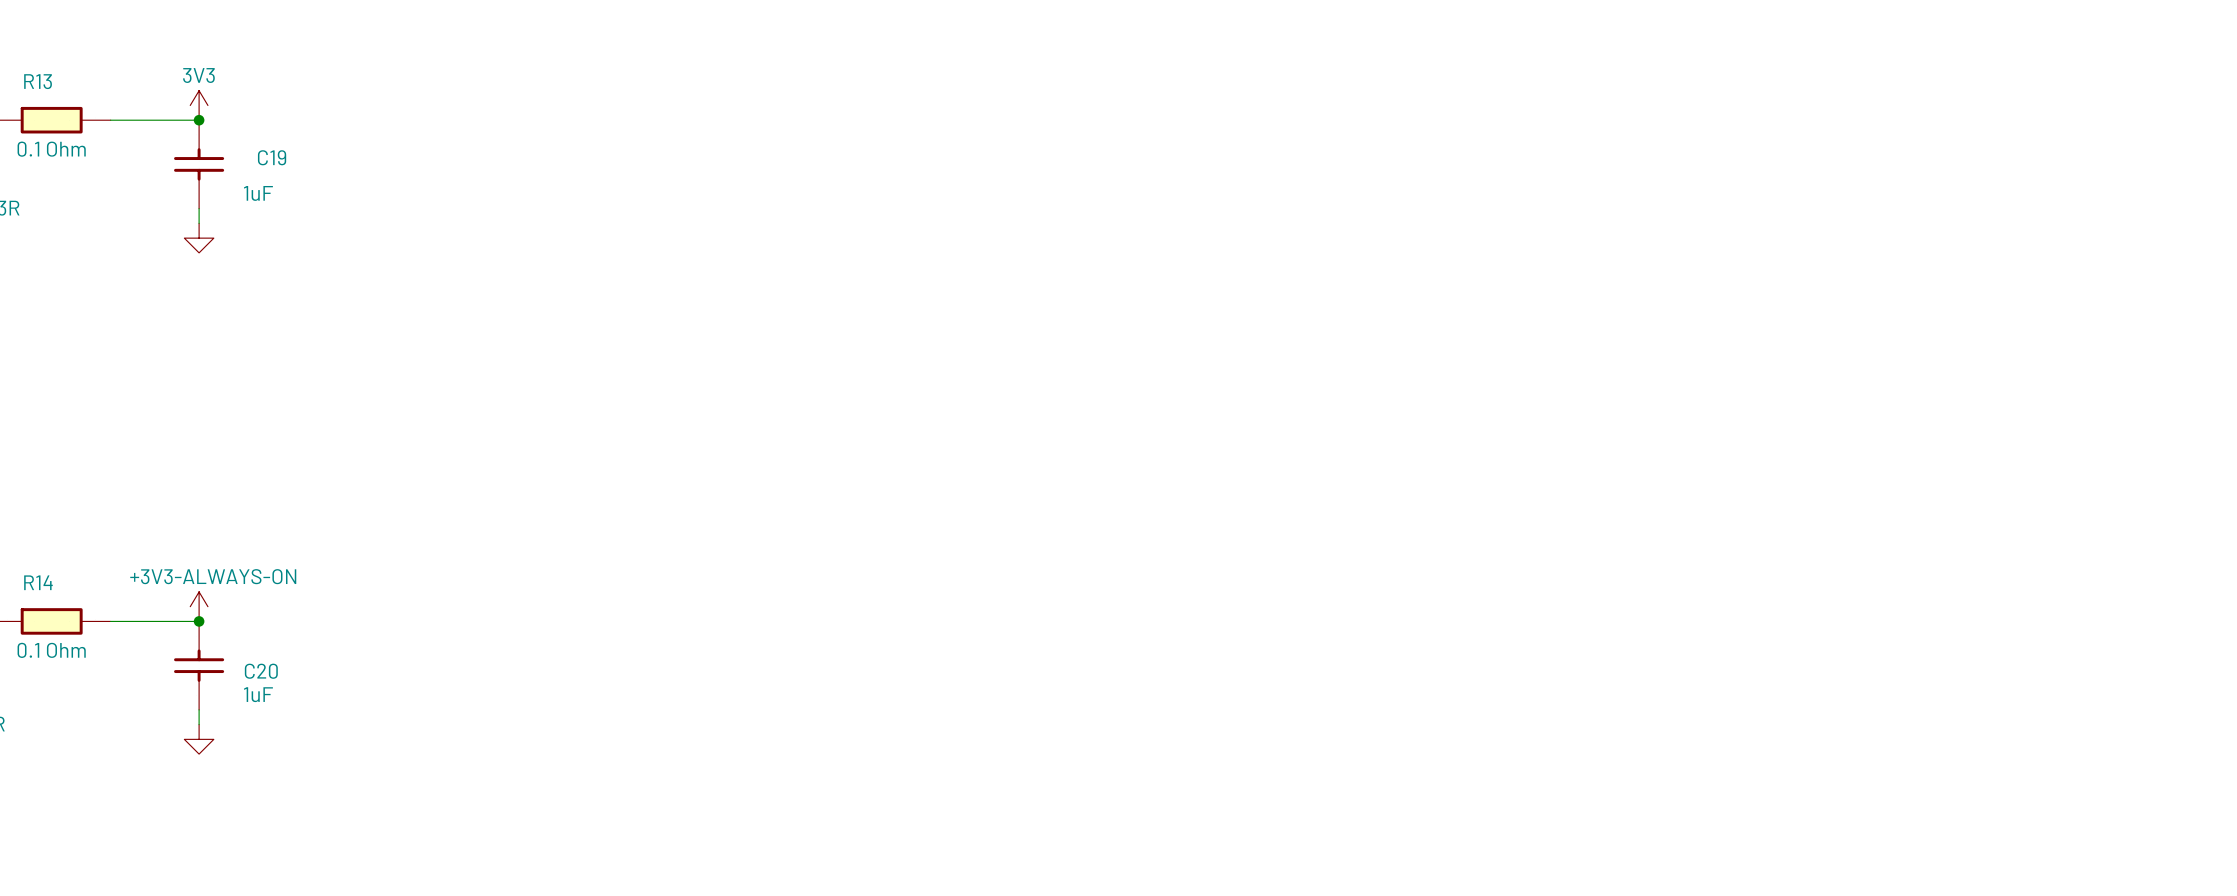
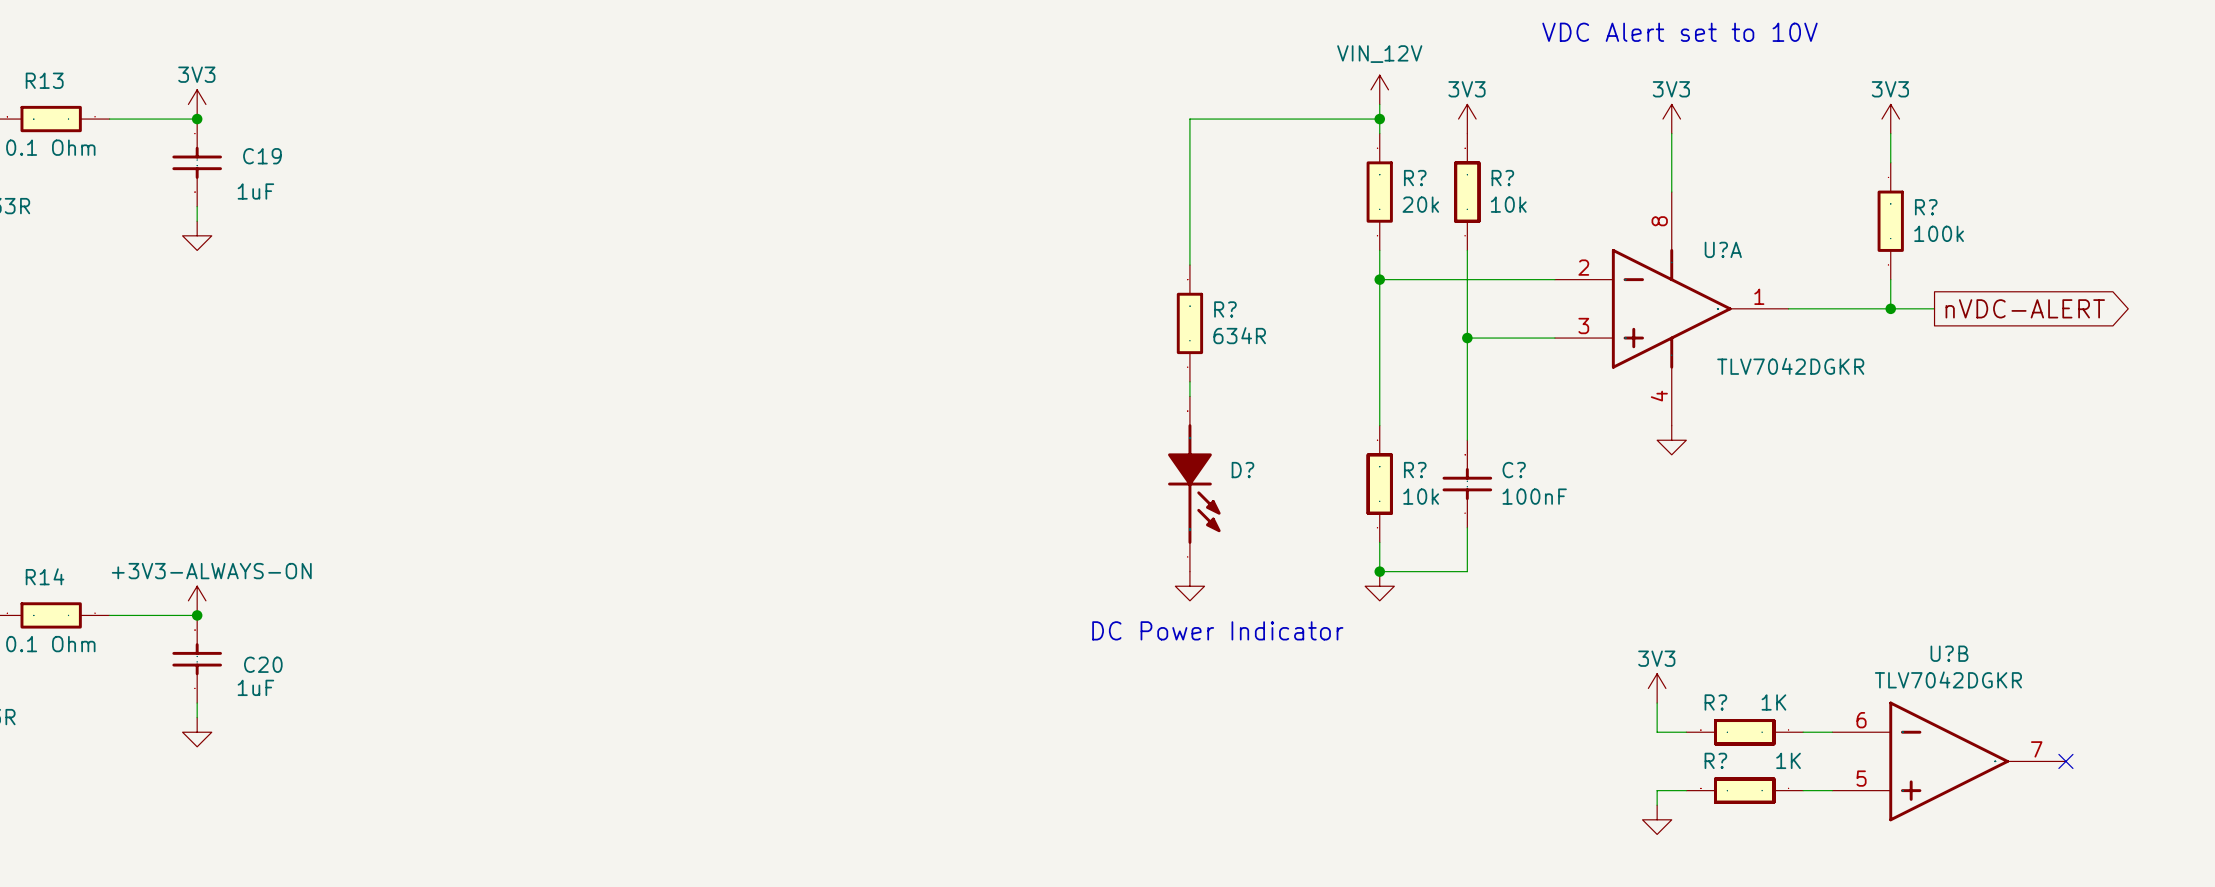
text: none -> VDC Alert set to 10V (1679, 32)
power symbol: none -> VIN_12V (1379, 89)
wire: none -> (1379, 104) (1379, 133)
wire: none -> (1379, 119) (1189, 119) (1189, 265)
junction: none -> (1379, 119)
power symbol: none -> 3V3 (1467, 119)
power symbol: none -> 3V3 (1671, 119)
power symbol: none -> 3V3 (1890, 119)
wire: none -> (1671, 133) (1671, 192)
wire: none -> (1890, 133) (1890, 162)
R?: none -> (1379, 192)
R?: none -> (1467, 192)
R?: none -> (1890, 221)
wire: none -> (1379, 250) (1379, 425)
wire: none -> (1467, 250) (1467, 440)
wire: none -> (1379, 279) (1554, 279)
junction: none -> (1379, 279)
wire: none -> (1890, 279) (1890, 308)
U?A: none -> TLV7042DGKR (1671, 308)
wire: none -> (1788, 308) (1934, 308)
junction: none -> (1890, 308)
global label: none -> nVDC-ALERT (2025, 308)
R?: none -> (1189, 323)
wire: none -> (1467, 338) (1554, 338)
junction: none -> (1467, 338)
wire: none -> (1189, 381) (1189, 396)
power symbol: none -> (1671, 440)
D?: none -> (1194, 484)
R?: none -> (1379, 484)
C?: none -> (1467, 484)
wire: none -> (1467, 527) (1467, 571) (1379, 571) (1379, 542)
junction: none -> (1379, 571)
power symbol: none -> (1189, 586)
power symbol: none -> (1379, 586)
text: none -> DC Power Indicator (1217, 630)
power symbol: none -> 3V3 (1657, 688)
wire: none -> (1657, 703) (1657, 732) (1686, 732)
R?: none -> (1744, 732)
wire: none -> (1803, 732) (1832, 732)
U?B: none -> TLV7042DGKR (1949, 761)
no-connect mark: none -> (2065, 761)
wire: none -> (1686, 790) (1657, 790) (1657, 805)
R?: none -> (1744, 790)
wire: none -> (1803, 790) (1832, 790)
power symbol: none -> (1657, 819)

